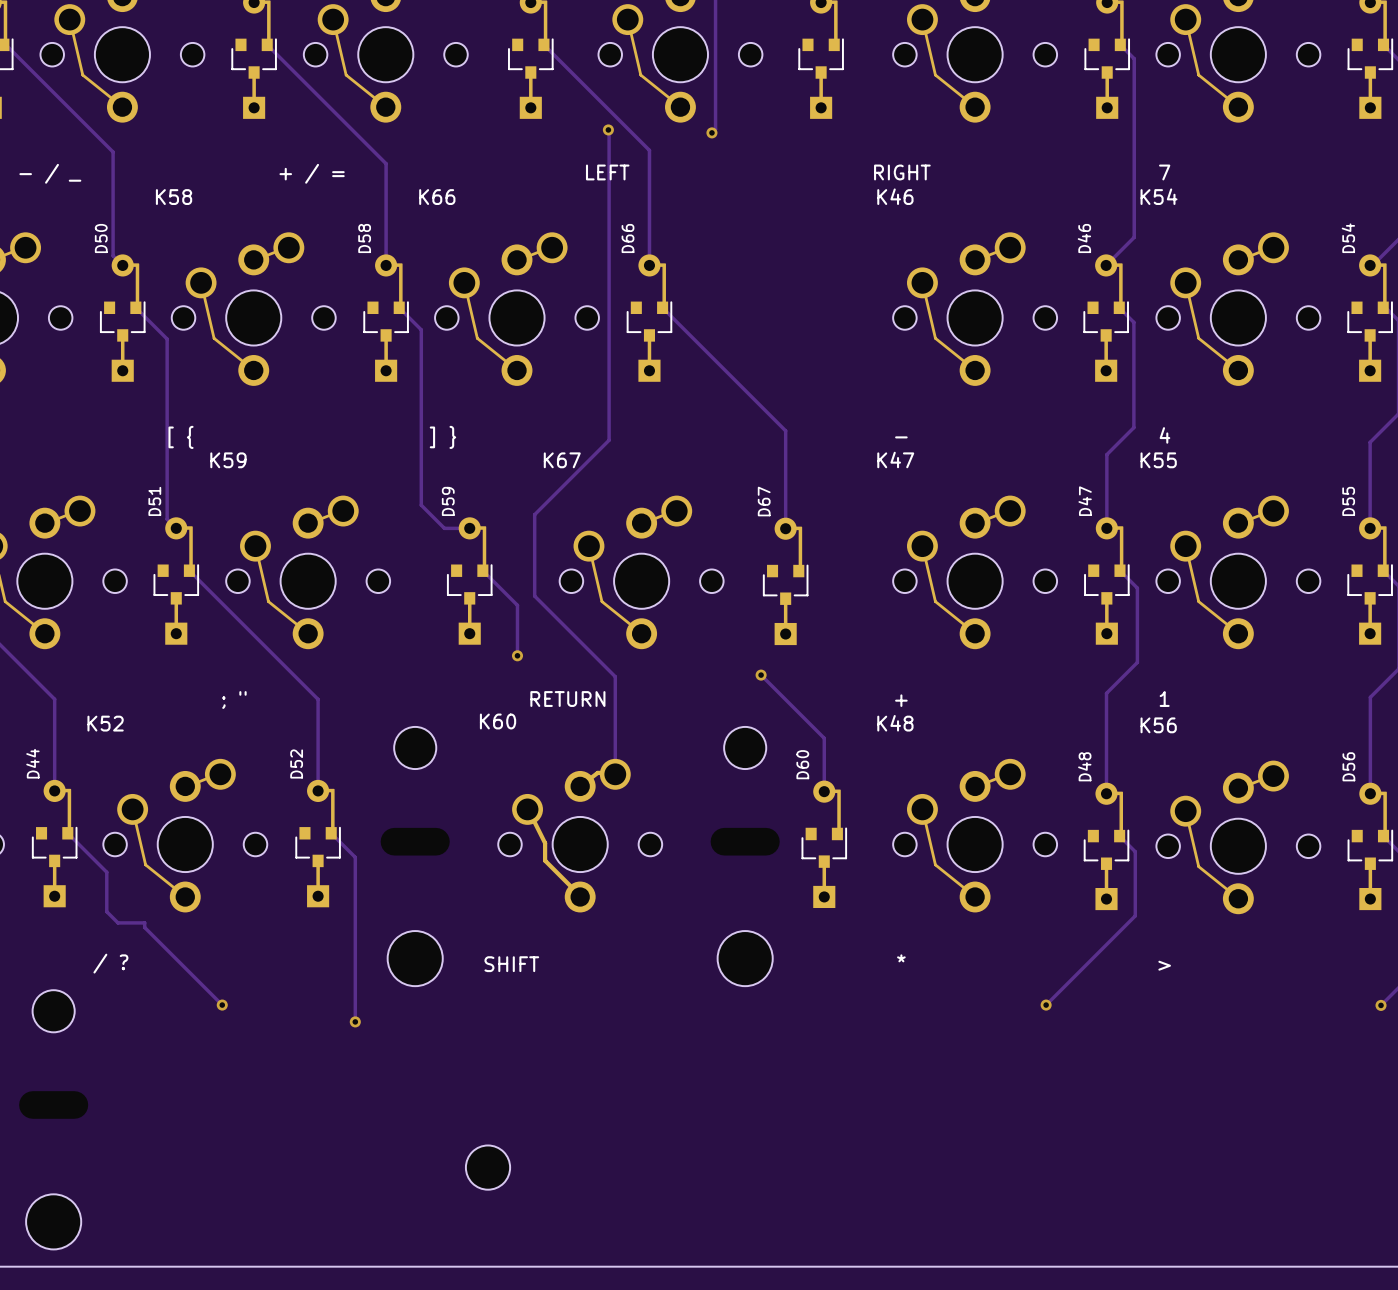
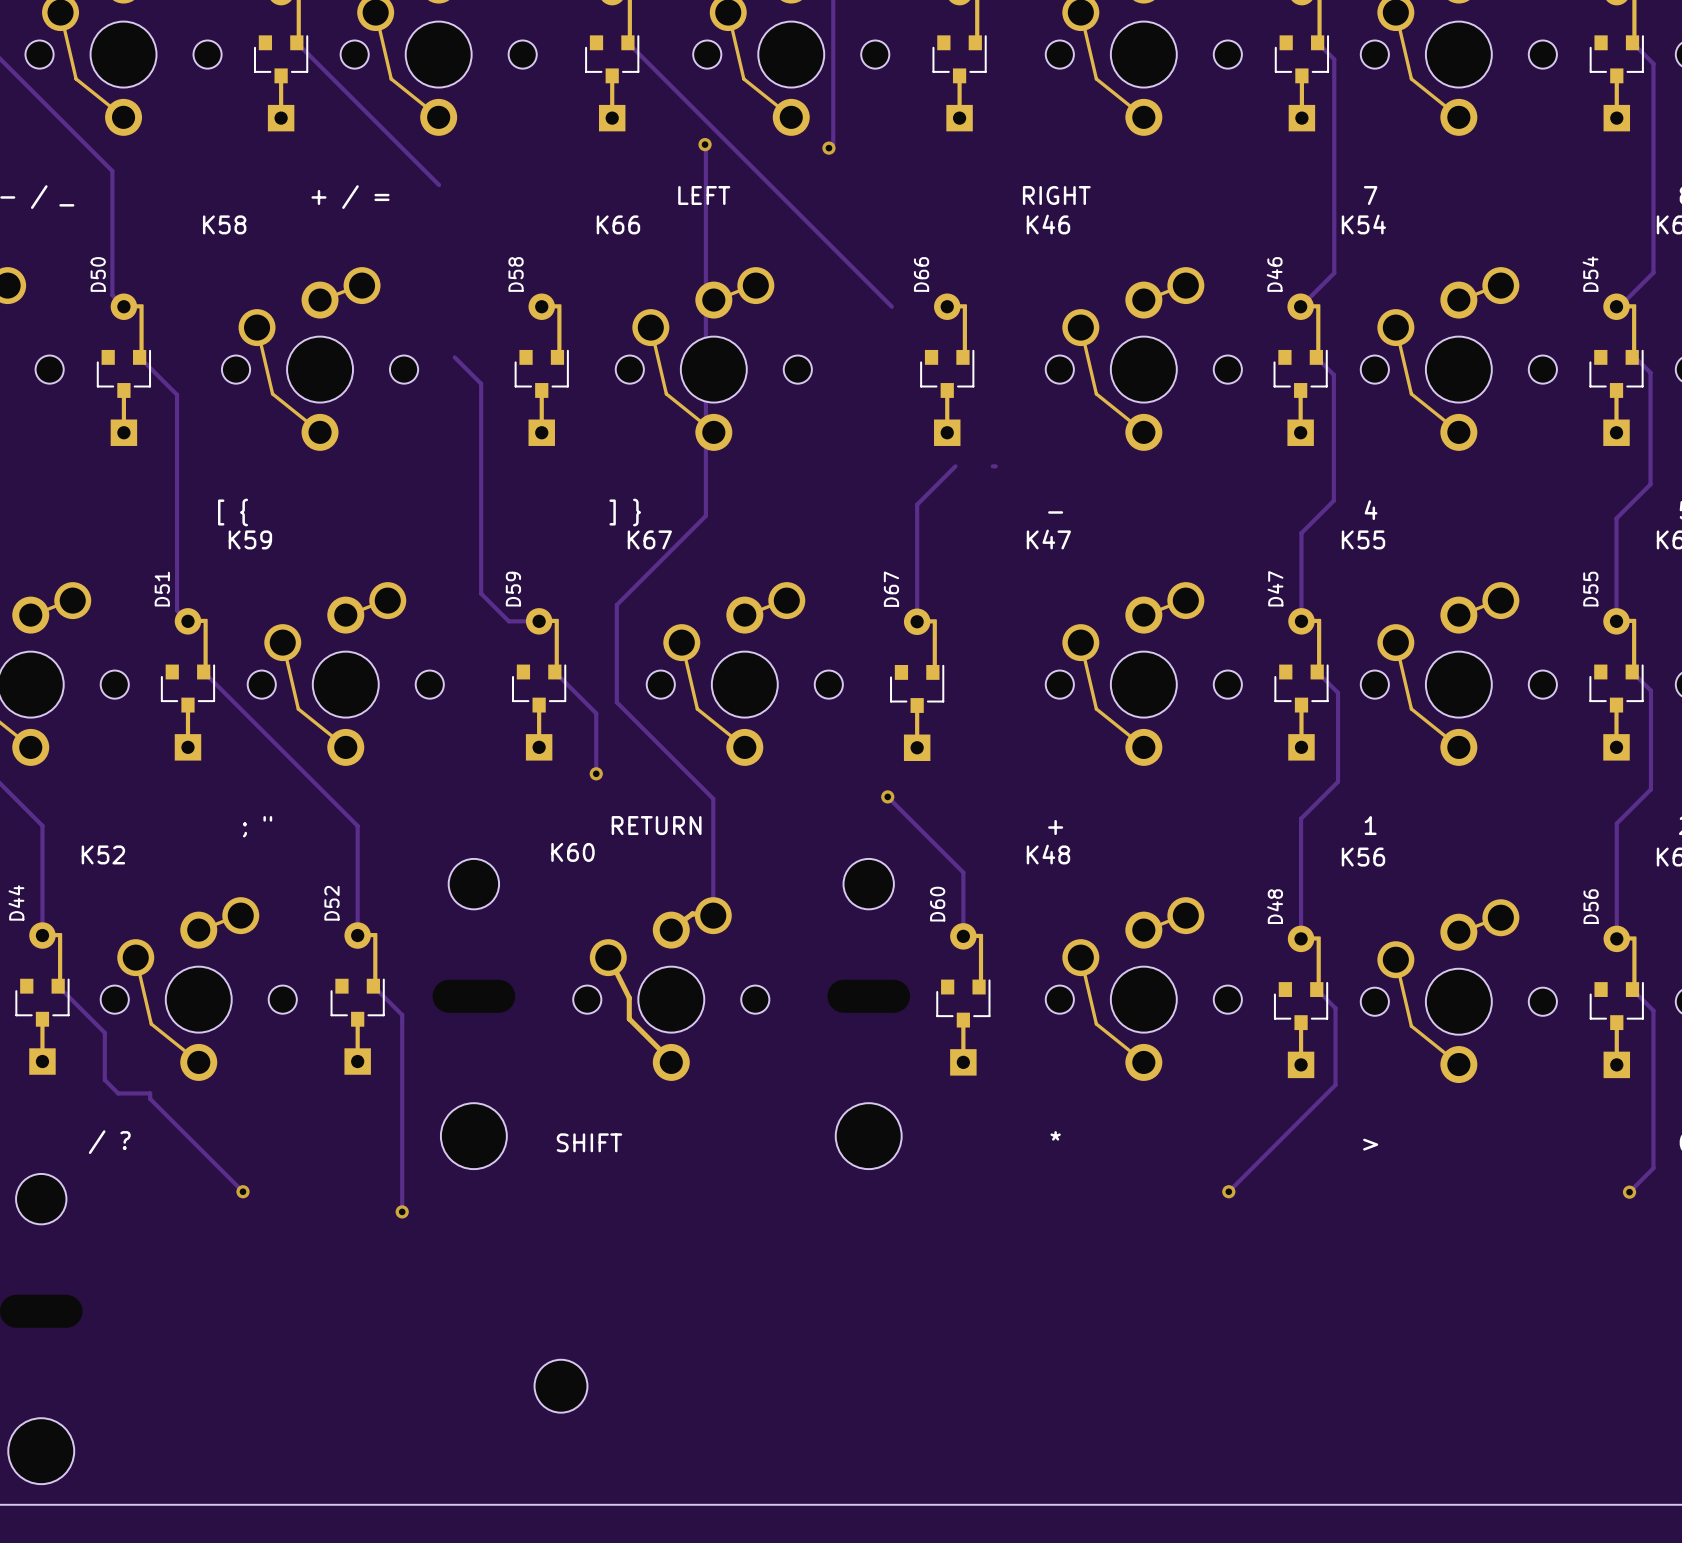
track: (649, 150) (649, 265) -> (754, 169) (891, 306)
track: (386, 163) (386, 265) -> none
track: (662, 307) (785, 430) -> (955, 466) (917, 504)
K58 position: (253, 309) -> (320, 358)
K66 position: (517, 309) -> (713, 358)
D58 position: (386, 318) -> (541, 369)
D66 position: (649, 318) -> (947, 369)
track: none -> (992, 466) (995, 466)

